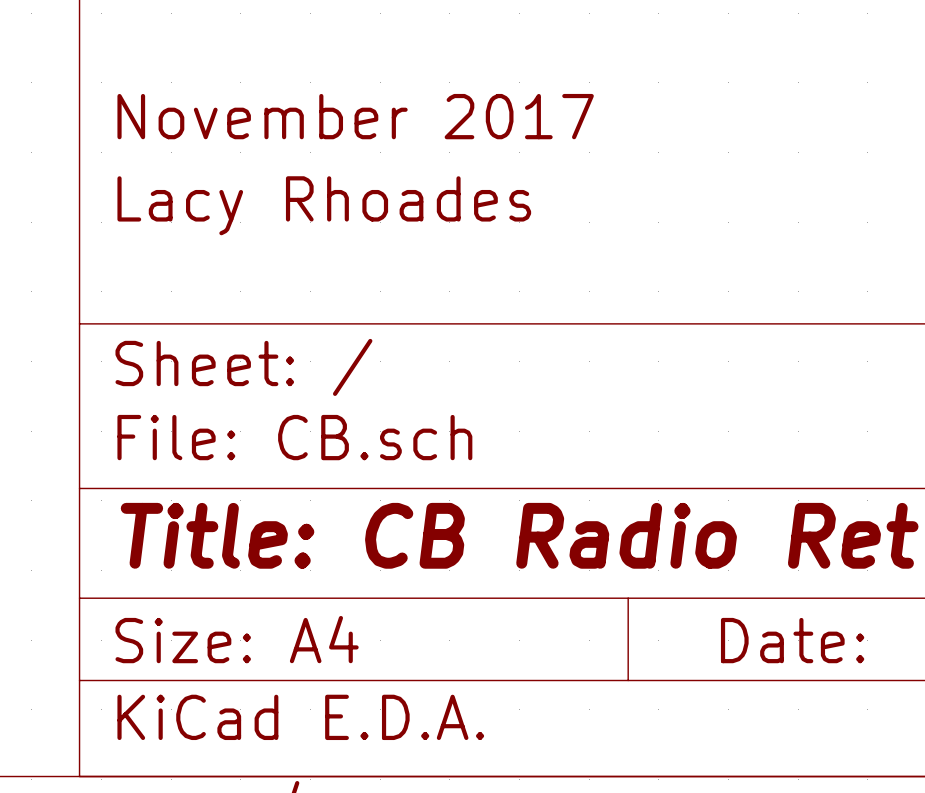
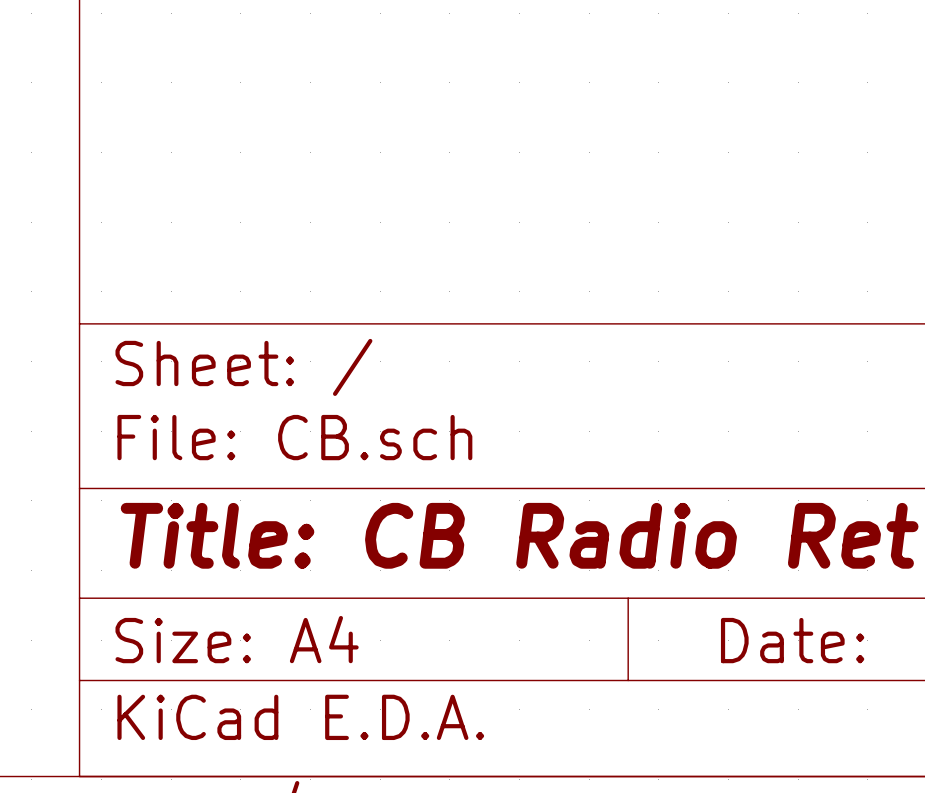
title block: November 2017 (355, 116) -> none
title block: Lacy Rhoades (324, 205) -> none

